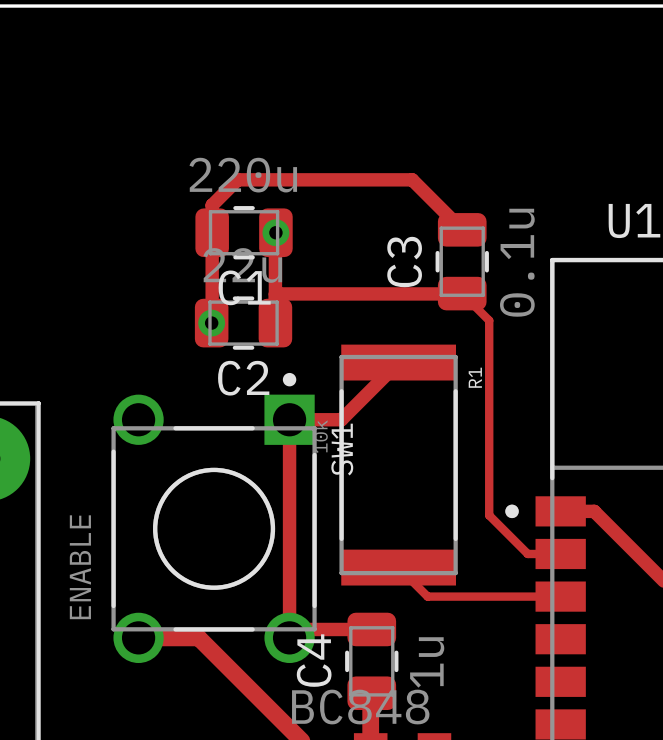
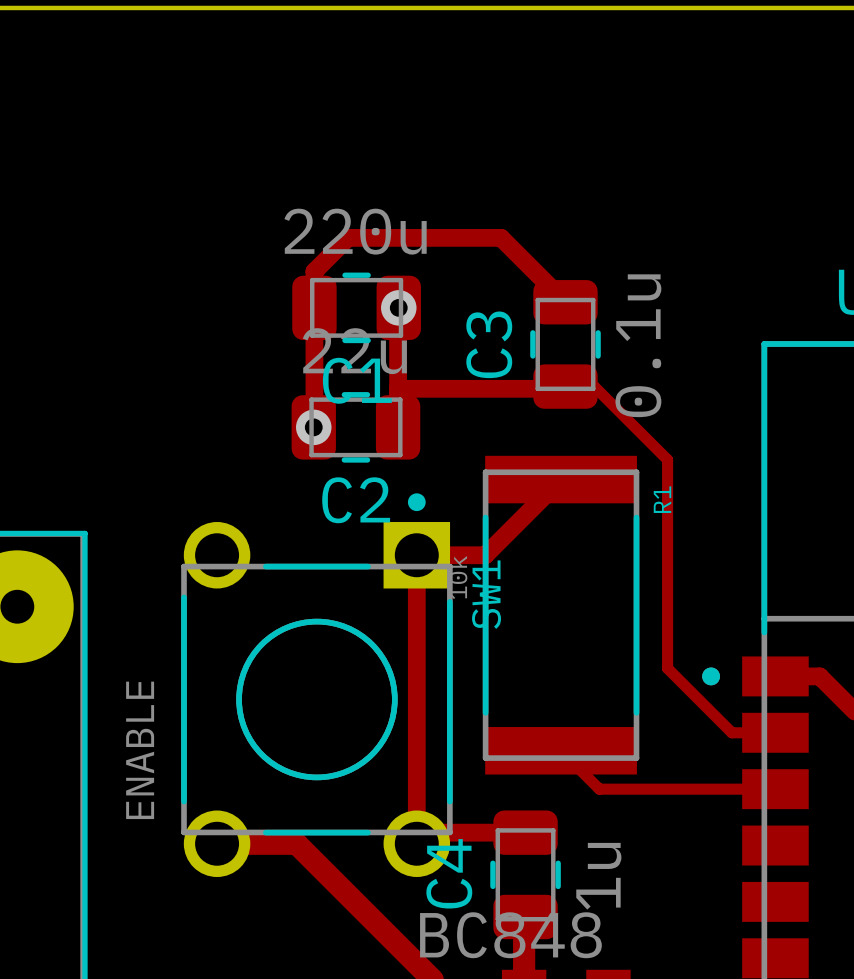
track: (353, 179) (412, 179) (462, 229) -> (501, 237) (565, 302)
C3 position: (462, 261) -> (565, 344)
track: (400, 293) (461, 293) -> none
track: (462, 293) (489, 320) (489, 515) -> (563, 388) (565, 386) (594, 386) (667, 459) (667, 668) (680, 681)

